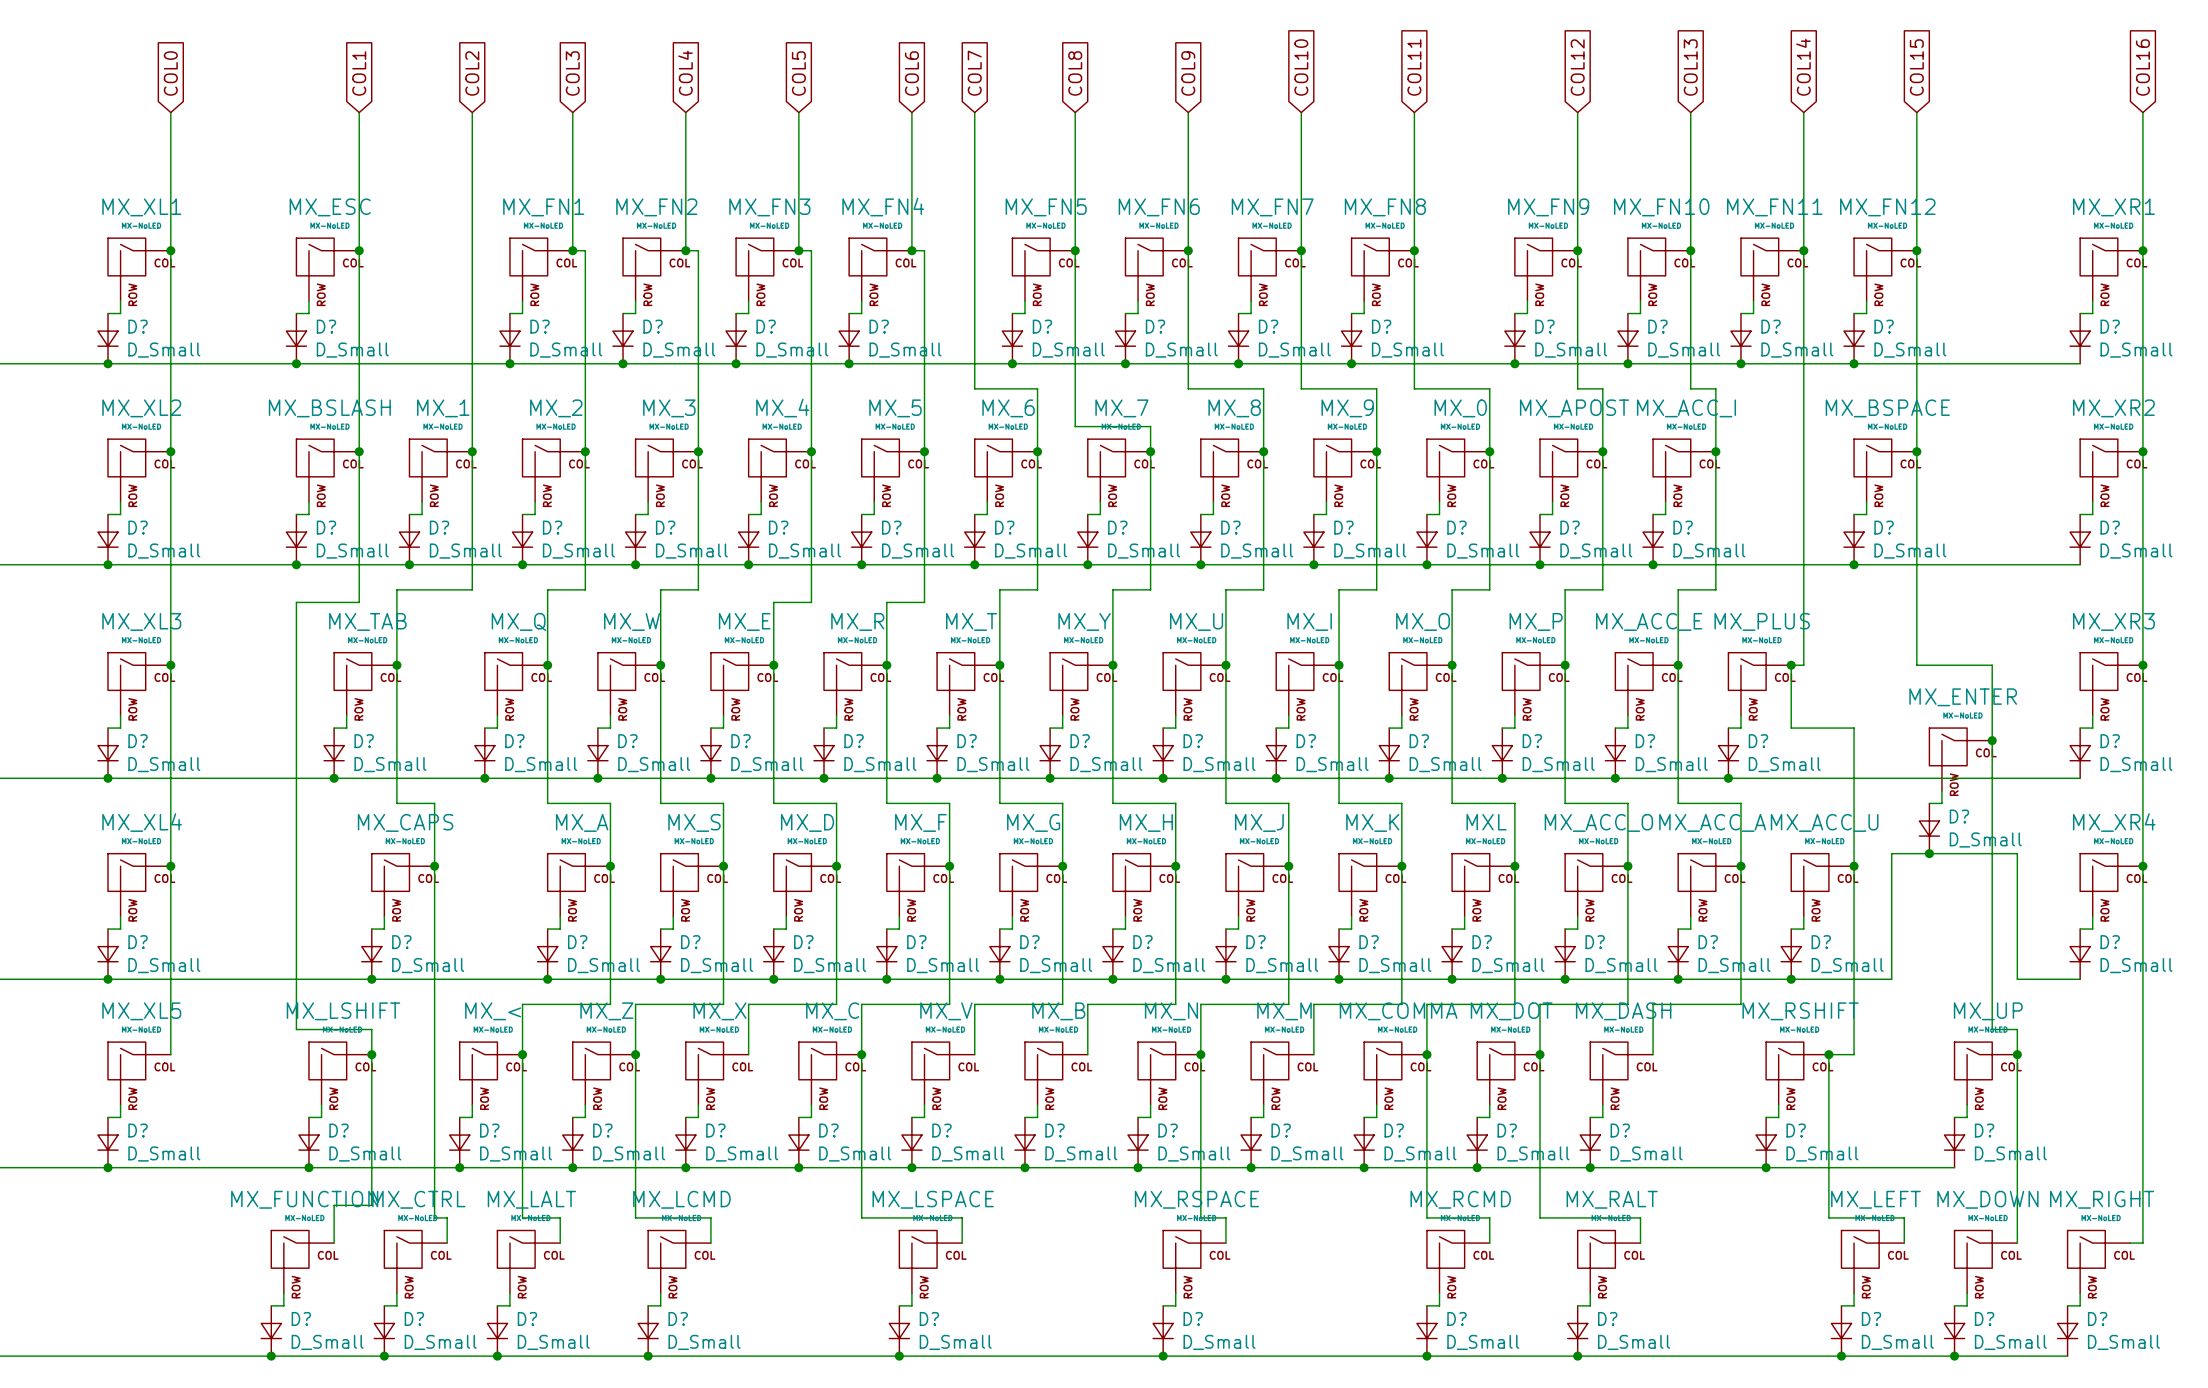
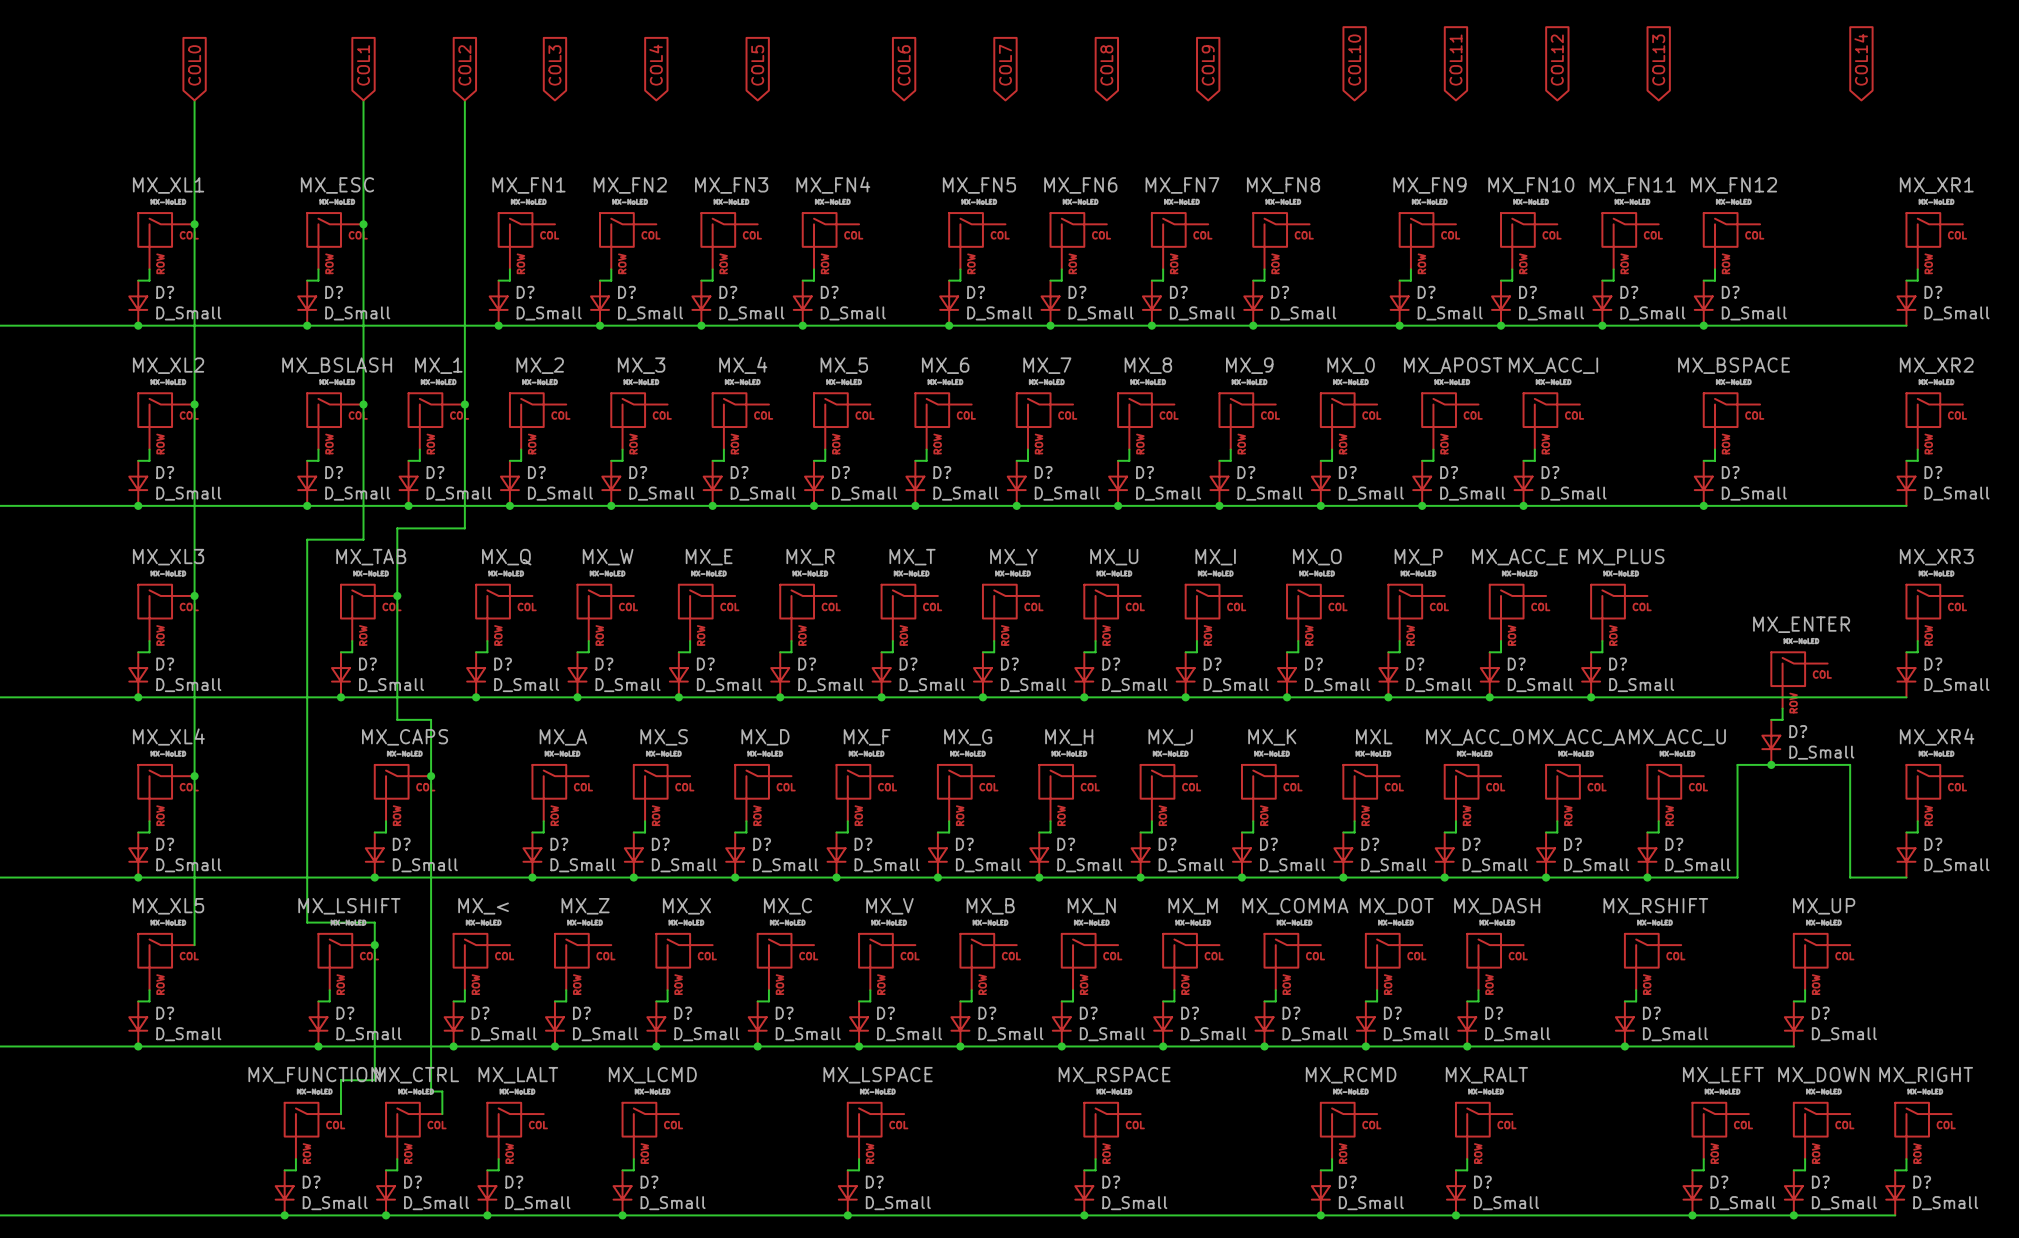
global label: COL10 (1301, 67) -> COL9 (1208, 65)
global label: COL11 (1414, 67) -> none
global label: none -> COL10 (1354, 60)
global label: COL12 (1577, 67) -> COL11 (1455, 60)
global label: COL13 (1690, 67) -> COL12 (1557, 60)
global label: COL14 (1803, 67) -> COL13 (1658, 60)
global label: COL15 (1916, 67) -> none
global label: none -> COL14 (1861, 59)
global label: COL16 (2142, 67) -> none
global label position: COL6 (911, 73) -> COL6 (904, 65)
global label: COL7 (974, 73) -> none
global label: COL8 (1075, 73) -> COL7 (1005, 65)
global label: COL9 (1188, 73) -> COL8 (1106, 65)
wire: (572, 112) (572, 250) (585, 250) (585, 589) (547, 589) (547, 803) (610, 803) (610, 1004) (522, 1004) (522, 1217) (560, 1217) (560, 1243) -> none
wire: (685, 112) (685, 250) (698, 250) (698, 589) (660, 589) (660, 803) (723, 803) (723, 1004) (635, 1004) (635, 1217) (710, 1217) (710, 1243) -> none
wire: (798, 112) (798, 250) (811, 250) (811, 602) (773, 602) (773, 803) (836, 803) (836, 1004) (748, 1004) (748, 1054) -> none
wire: (911, 112) (911, 250) (924, 250) (924, 602) (886, 602) (886, 803) (949, 803) (949, 1004) (861, 1004) (861, 1217) (962, 1217) (962, 1243) -> none
wire: (974, 112) (974, 388) (1037, 388) (1037, 589) (999, 589) (999, 803) (1062, 803) (1062, 1004) (974, 1004) (974, 1054) -> none
wire: (1075, 112) (1075, 426) (1150, 426) (1150, 589) (1112, 589) (1112, 803) (1175, 803) (1175, 1004) (1087, 1004) (1087, 1054) -> none
wire: (1188, 112) (1188, 388) (1263, 388) (1263, 589) (1225, 589) (1225, 803) (1288, 803) (1288, 1004) (1200, 1004) (1200, 1217) (1225, 1217) (1225, 1243) -> none
wire: (1301, 112) (1301, 388) (1376, 388) (1376, 589) (1339, 589) (1339, 803) (1401, 803) (1401, 1004) (1313, 1004) (1313, 1054) -> none
wire: (1414, 112) (1414, 388) (1489, 388) (1489, 589) (1452, 589) (1452, 803) (1514, 803) (1514, 1004) (1426, 1004) (1426, 1217) (1489, 1217) (1489, 1243) -> none
wire: (1577, 112) (1577, 388) (1602, 388) (1602, 589) (1565, 589) (1565, 803) (1627, 803) (1627, 1004) (1540, 1004) (1540, 1217) (1640, 1217) (1640, 1243) -> none
wire: (1690, 112) (1690, 388) (1715, 388) (1715, 589) (1678, 589) (1678, 803) (1740, 803) (1740, 1004) (1653, 1004) (1653, 1054) -> none
wire: (1803, 112) (1803, 665) (1791, 665) (1791, 728) (1854, 728) (1854, 1054) (1828, 1054) (1828, 1217) (1904, 1217) (1904, 1243) -> none
wire: (1916, 112) (1916, 665) (1992, 665) (1992, 1029) (2017, 1029) (2017, 1243) -> none
wire: (2142, 112) (2142, 1243) (2130, 1243) -> none
junction: (572, 250) -> none
junction: (685, 250) -> none
junction: (798, 250) -> none
junction: (911, 250) -> none
junction: (1075, 250) -> none
junction: (1188, 250) -> none
junction: (1301, 250) -> none
junction: (1414, 250) -> none
junction: (1577, 250) -> none
junction: (1690, 250) -> none
junction: (1803, 250) -> none
junction: (1916, 250) -> none
junction: (2142, 250) -> none
junction: (585, 451) -> none
junction: (698, 451) -> none
junction: (811, 451) -> none
junction: (924, 451) -> none
junction: (1037, 451) -> none
junction: (1150, 451) -> none
junction: (1263, 451) -> none
junction: (1376, 451) -> none
junction: (1489, 451) -> none
junction: (1602, 451) -> none
junction: (1715, 451) -> none
junction: (1916, 451) -> none
junction: (2142, 451) -> none
junction: (547, 665) -> none
junction: (660, 665) -> none
junction: (773, 665) -> none
junction: (886, 665) -> none
junction: (999, 665) -> none
junction: (1112, 665) -> none
junction: (1225, 665) -> none
junction: (1339, 665) -> none
junction: (1452, 665) -> none
junction: (1565, 665) -> none
junction: (1678, 665) -> none
junction: (1791, 665) -> none
junction: (2142, 665) -> none
junction: (1992, 740) -> none
junction: (610, 866) -> none
junction: (723, 866) -> none
junction: (836, 866) -> none
junction: (949, 866) -> none
junction: (1062, 866) -> none
junction: (1175, 866) -> none
junction: (1288, 866) -> none
junction: (1401, 866) -> none
junction: (1514, 866) -> none
junction: (1627, 866) -> none
junction: (1740, 866) -> none
junction: (1854, 866) -> none
junction: (2142, 866) -> none
junction: (522, 1054) -> none
junction: (635, 1054) -> none
junction: (861, 1054) -> none
junction: (1200, 1054) -> none
junction: (1426, 1054) -> none
junction: (1540, 1054) -> none
junction: (1828, 1054) -> none
junction: (2017, 1054) -> none

